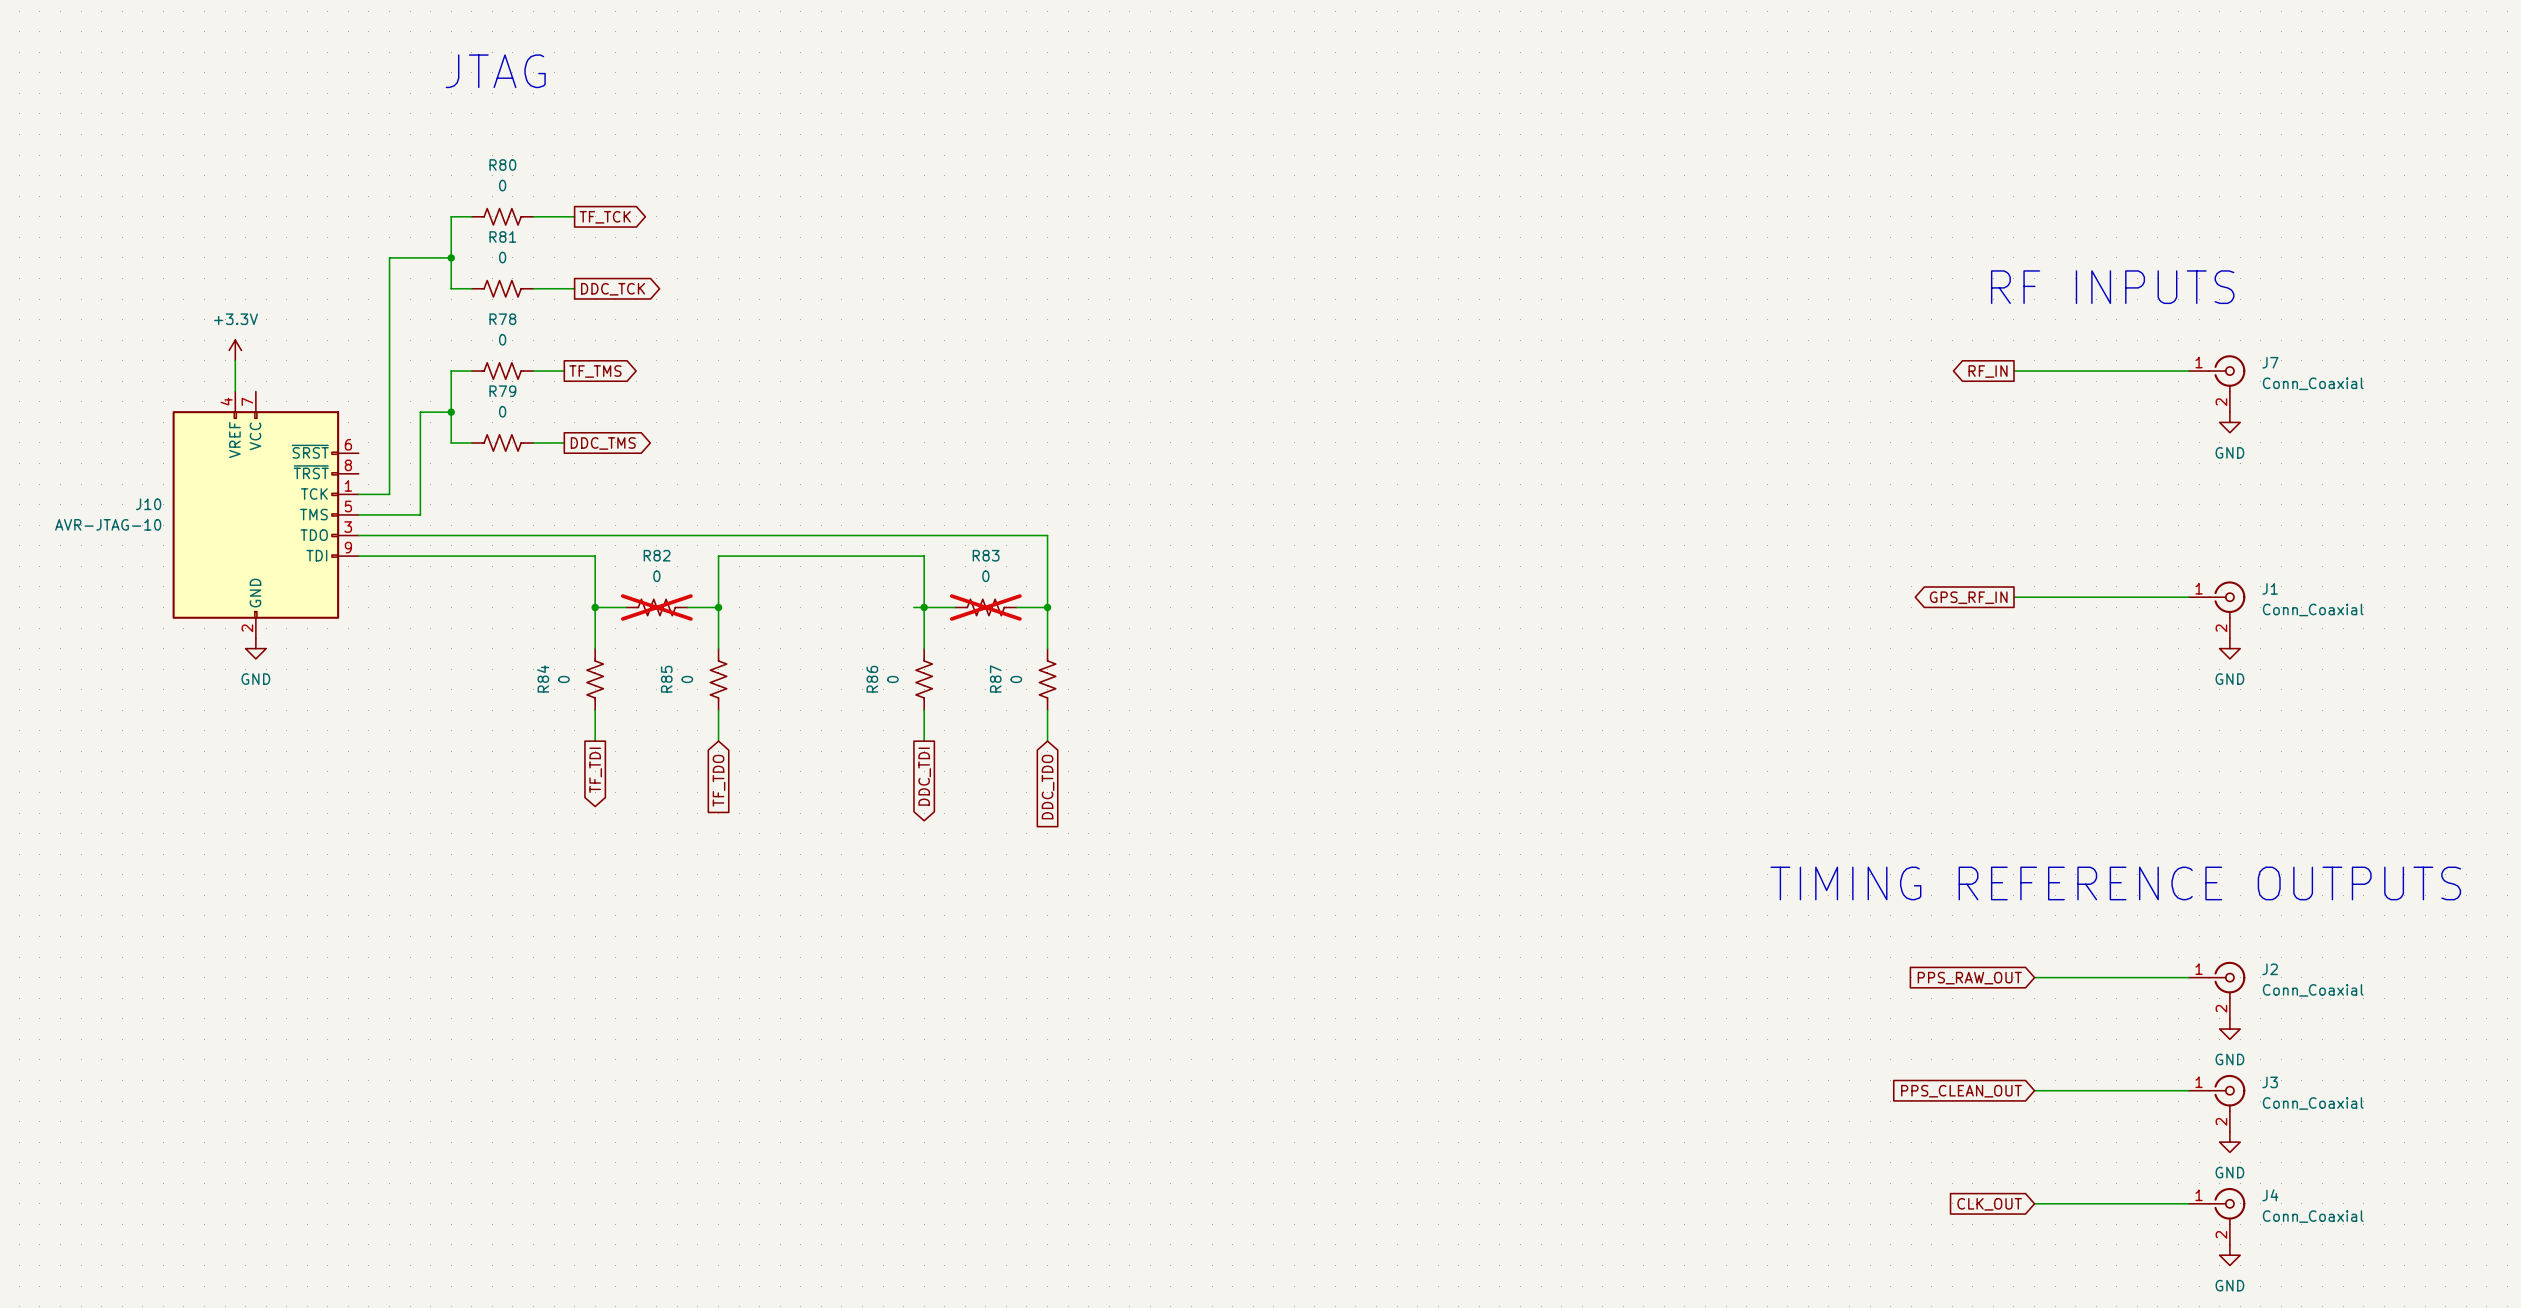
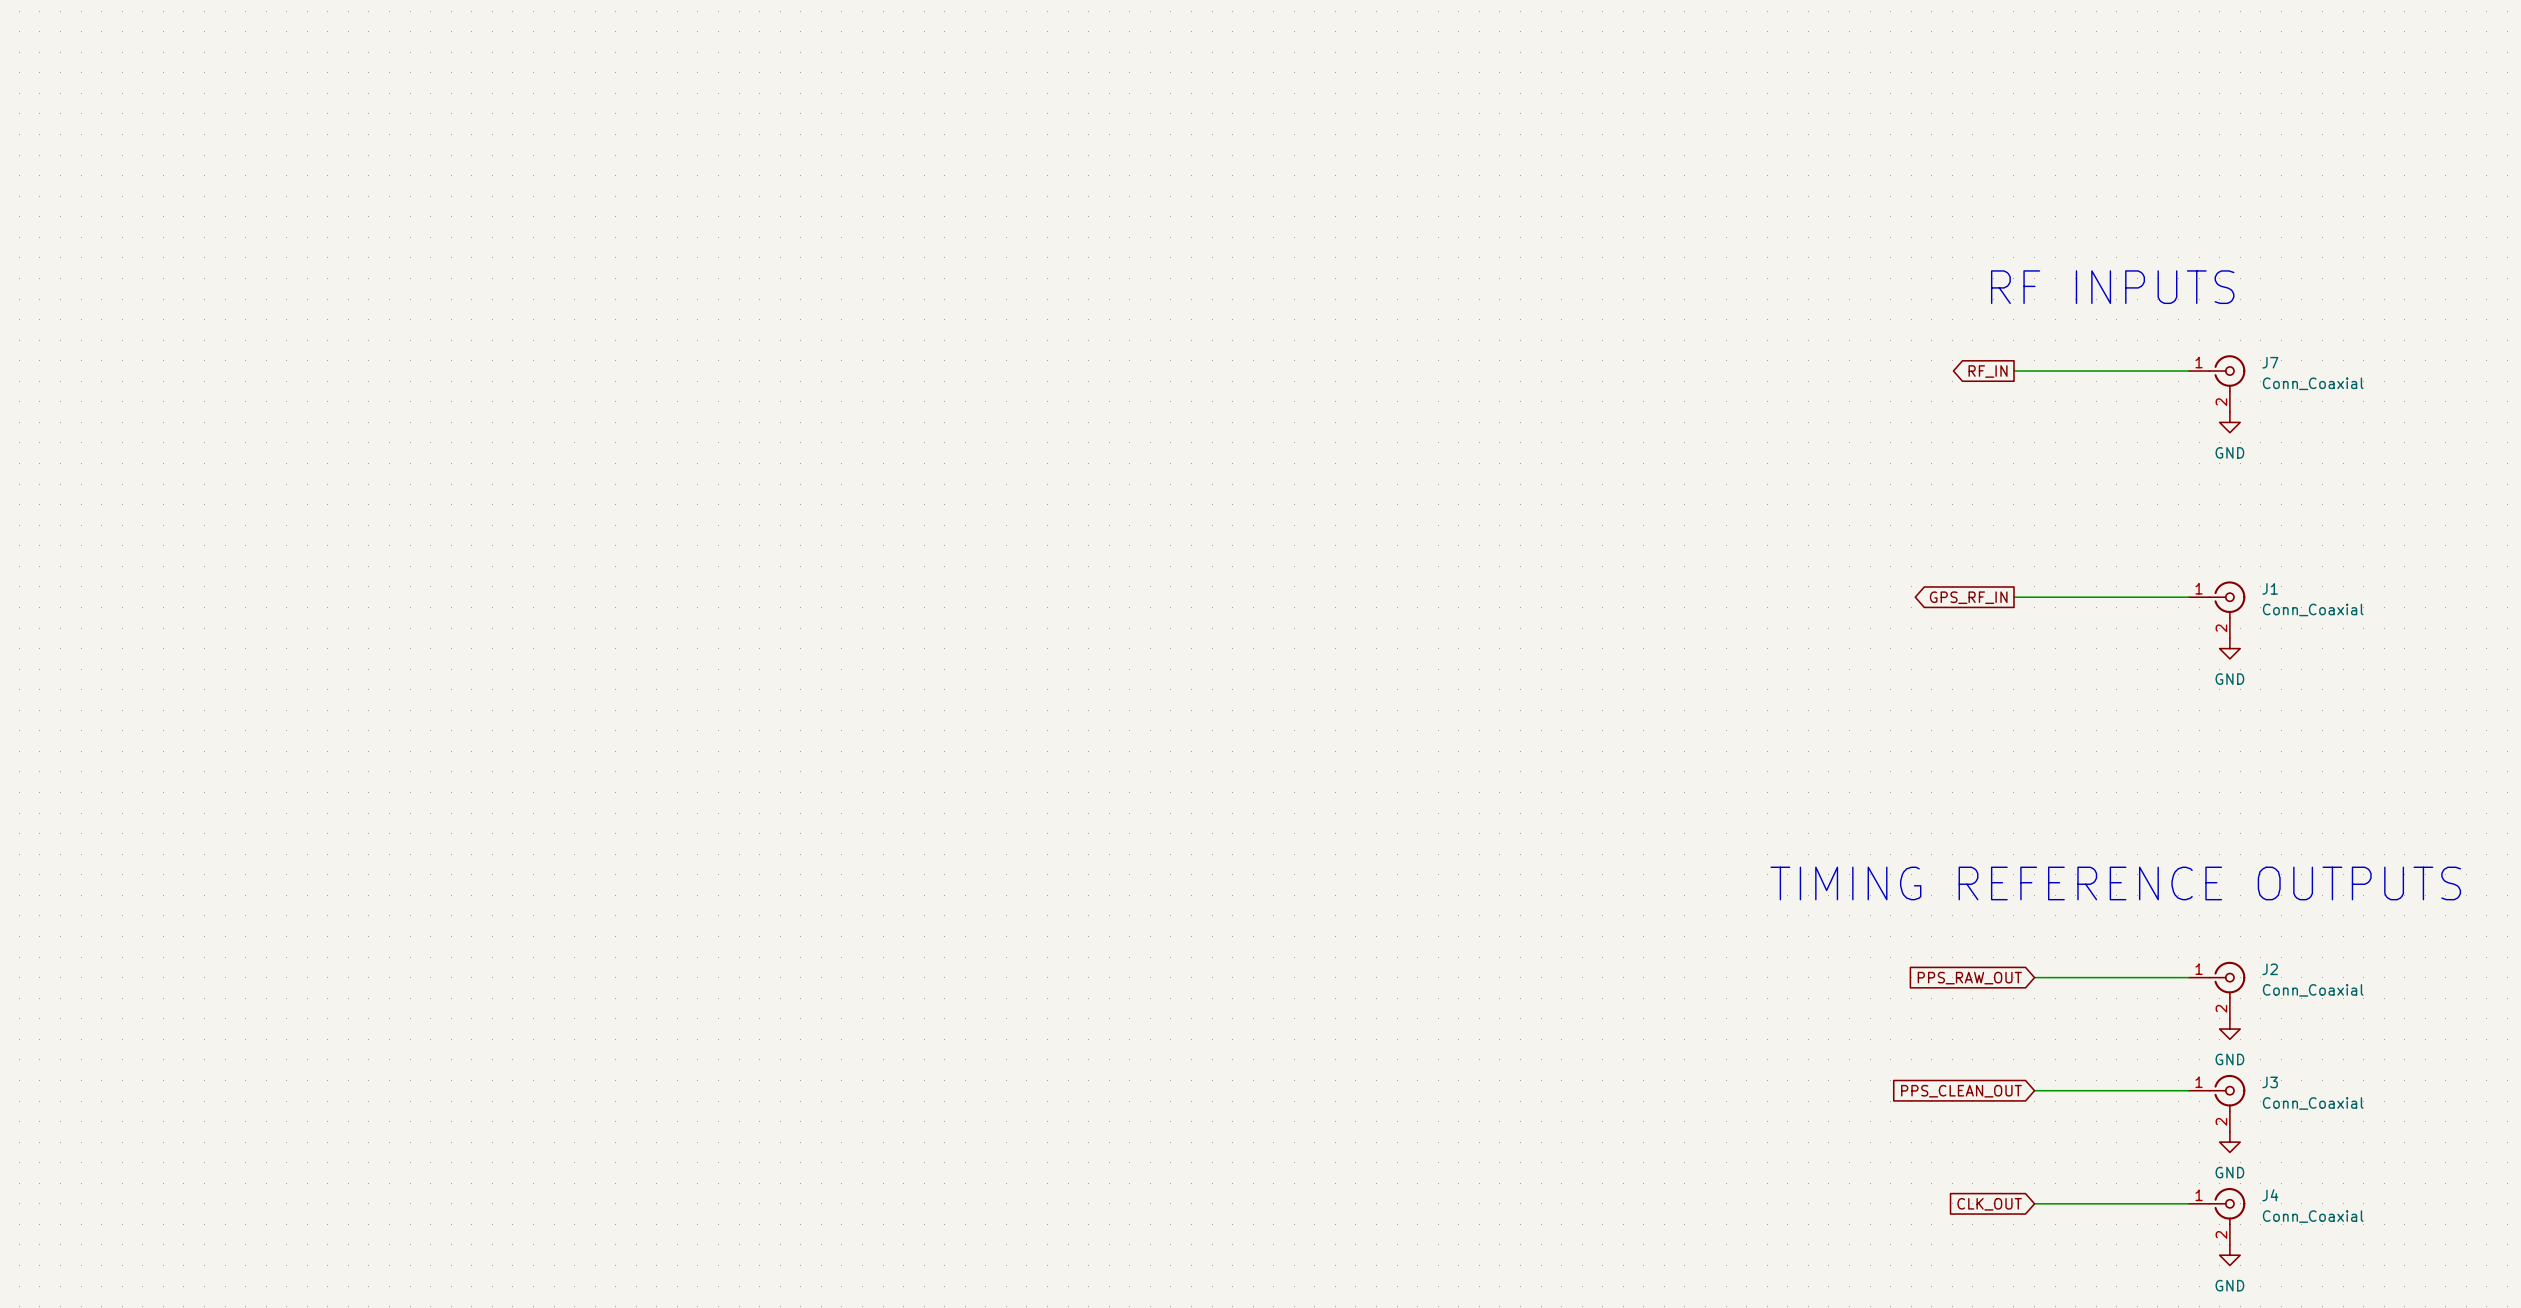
text: JTAG (495, 71) -> none
wire: (471, 216) (451, 216) (451, 288) (471, 288) -> none
R80: 0 (502, 216) -> none
wire: (533, 216) (574, 216) -> none
global label: TF_TCK (605, 217) -> none
wire: (451, 257) (389, 257) (389, 494) (358, 494) -> none
junction: (451, 257) -> none
R81: 0 (502, 288) -> none
wire: (533, 288) (574, 288) -> none
global label: DDC_TCK (613, 289) -> none
power symbol: +3.3V (235, 350) -> none
wire: (235, 360) (235, 391) -> none
wire: (471, 371) (451, 371) (451, 442) (471, 442) -> none
R78: 0 (502, 371) -> none
wire: (533, 371) (564, 371) -> none
global label: TF_TMS (595, 371) -> none
wire: (451, 412) (420, 412) (420, 514) (358, 514) -> none
junction: (451, 412) -> none
R79: 0 (502, 442) -> none
wire: (533, 442) (564, 442) -> none
global label: DDC_TMS (603, 443) -> none
J10: AVR-JTAG-10 (265, 514) -> none
wire: (358, 535) (1047, 535) (1047, 648) -> none
wire: (358, 556) (595, 556) (595, 648) -> none
wire: (595, 607) (626, 607) -> none
junction: (595, 607) -> none
R82: 0 (656, 607) -> none
wire: (687, 607) (718, 607) -> none
junction: (718, 607) -> none
wire: (913, 607) (955, 607) -> none
junction: (924, 607) -> none
R83: 0 (985, 607) -> none
wire: (1016, 607) (1047, 607) -> none
junction: (1047, 607) -> none
power symbol: GND (255, 648) -> none
wire: (718, 648) (718, 556) (924, 556) (924, 648) -> none
R84: 0 (595, 679) -> none
R85: 0 (718, 679) -> none
R86: 0 (924, 679) -> none
R87: 0 (1047, 679) -> none
wire: (595, 710) (595, 741) -> none
wire: (718, 710) (718, 741) -> none
wire: (924, 710) (924, 741) -> none
wire: (1047, 710) (1047, 741) -> none
global label: TF_TDI (595, 770) -> none
global label: DDC_TDI (924, 776) -> none
global label: TF_TDO (719, 780) -> none
global label: DDC_TDO (1048, 787) -> none

